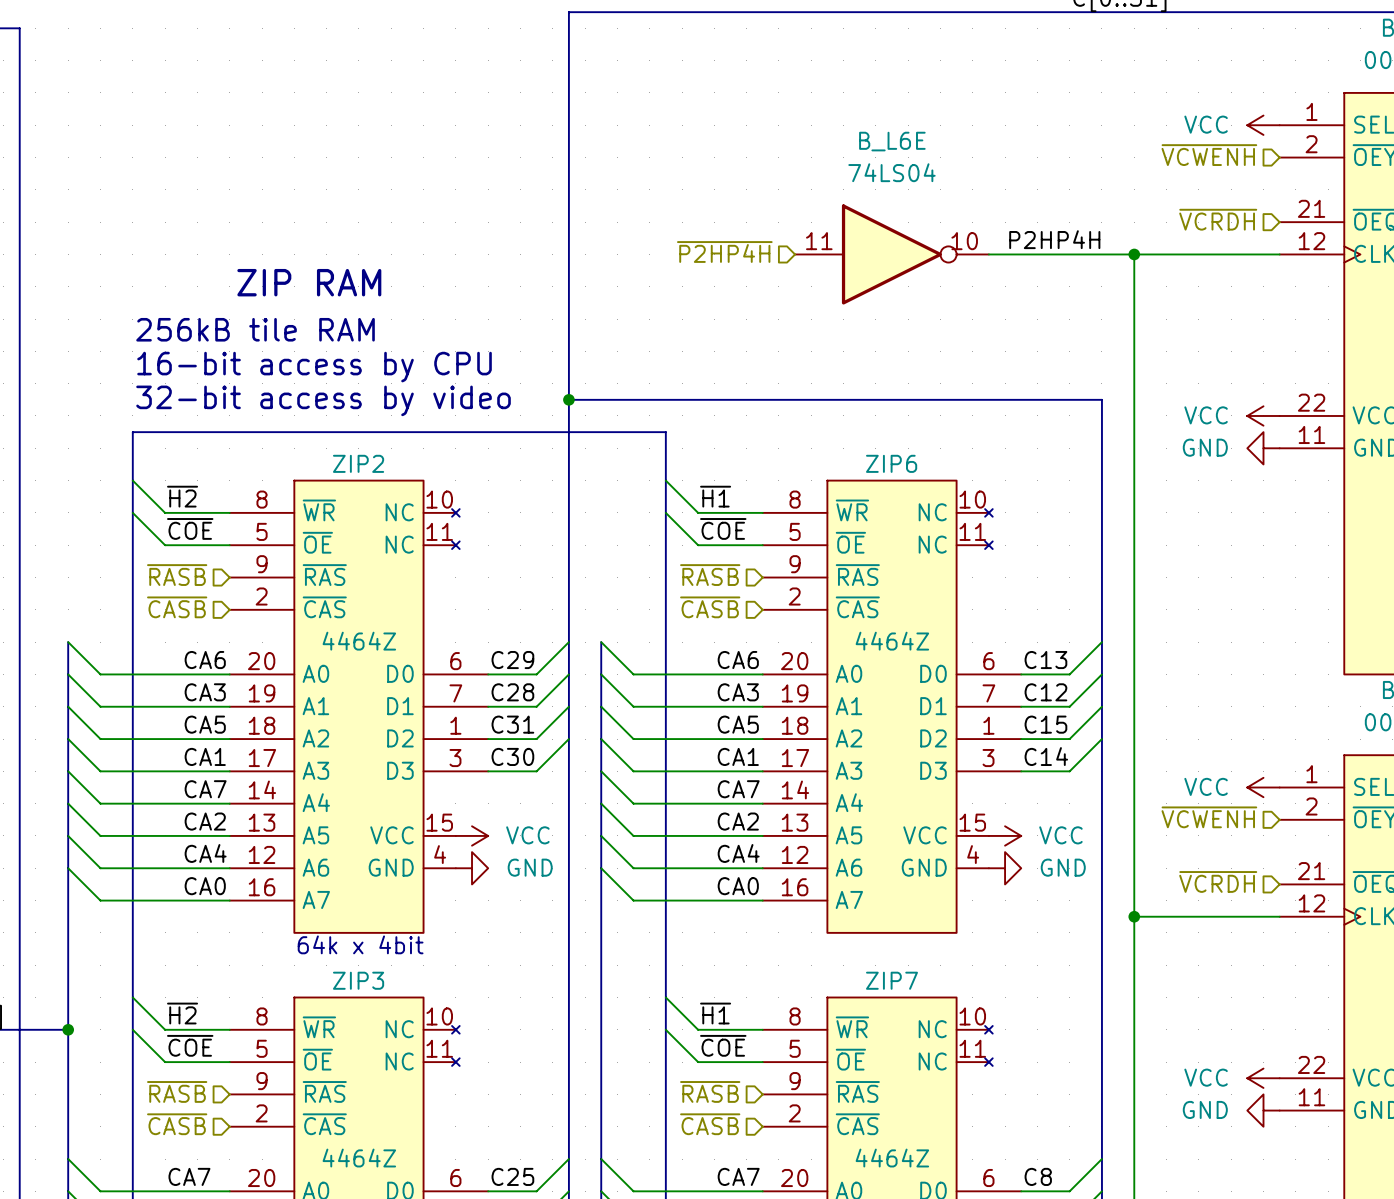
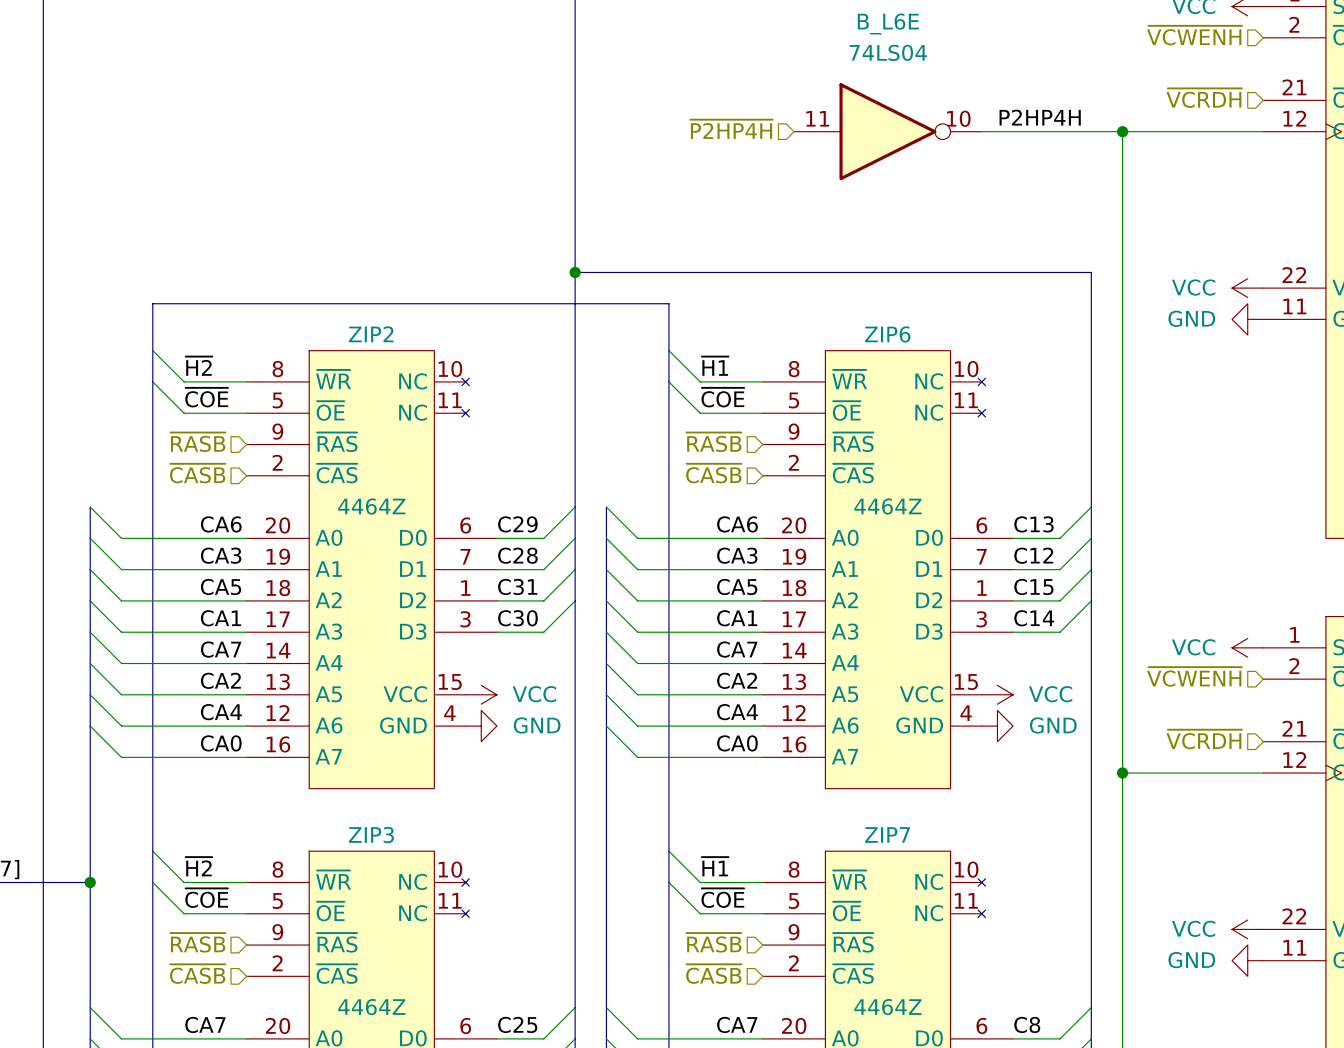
text: ZIP RAM (309, 282) -> none
text: 256kB tile RAM (255, 329) -> none
text: 16-bit access by CPU (314, 367) -> none
text: 32-bit access by video (323, 400) -> none
text: 64k x 4bit (360, 944) -> none

